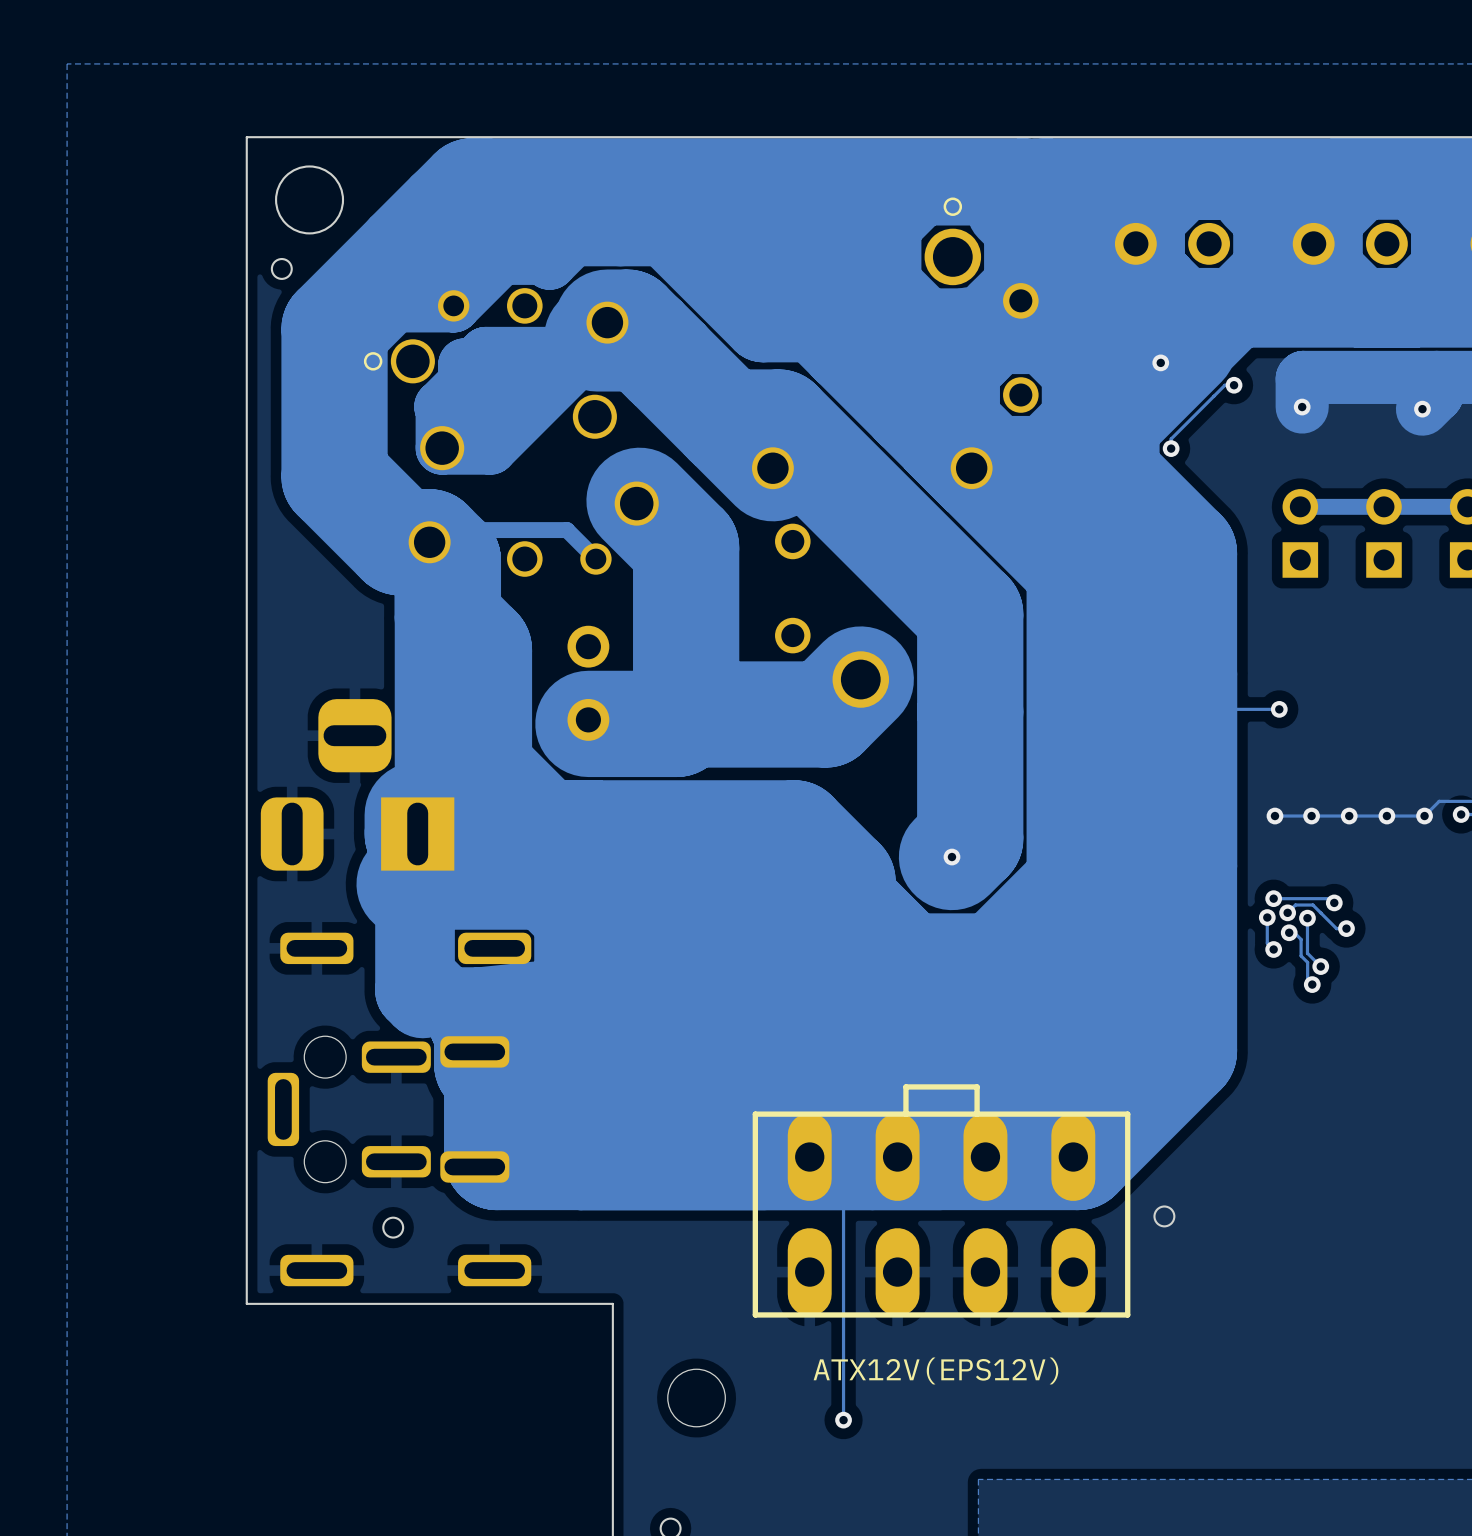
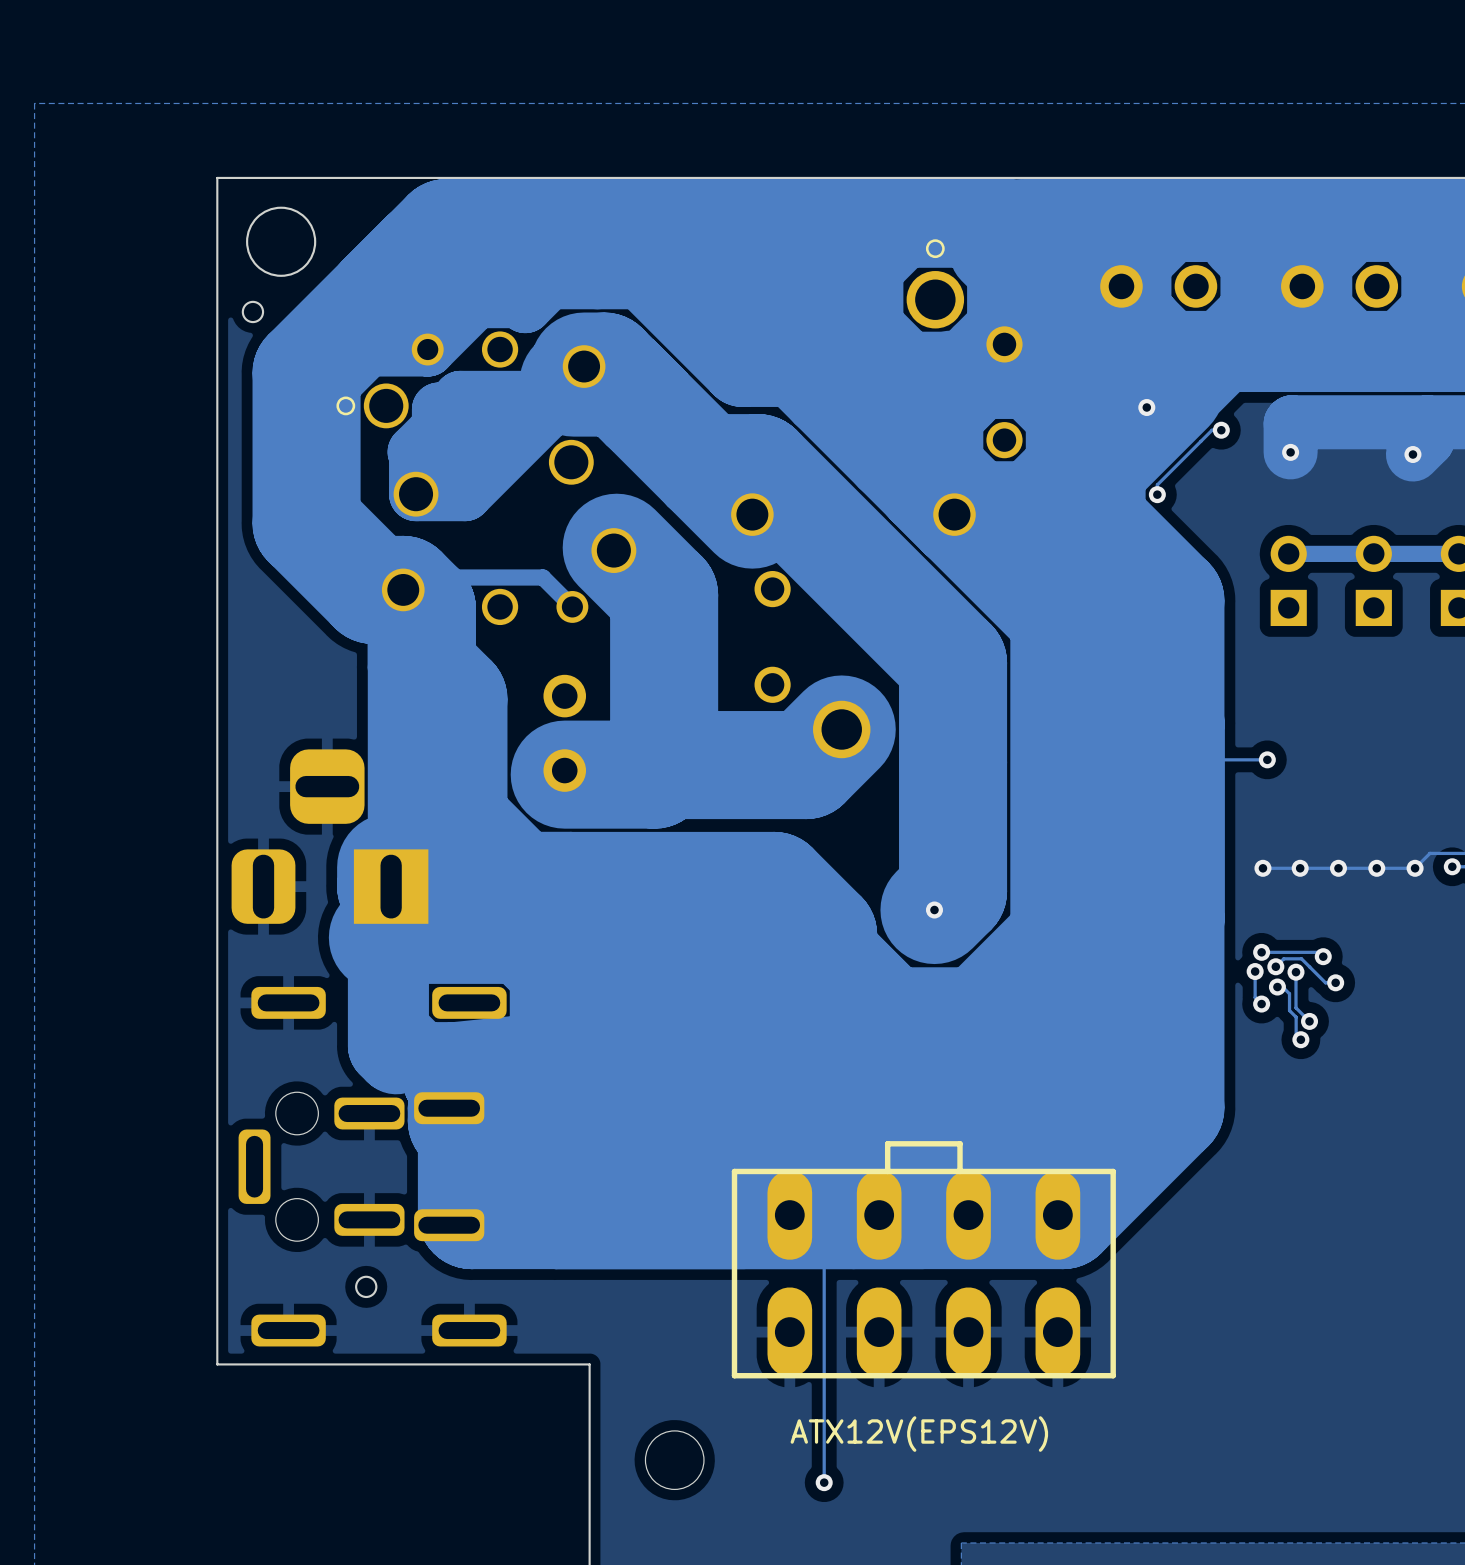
round board edge: [1153, 1205, 1176, 1228] -> none

